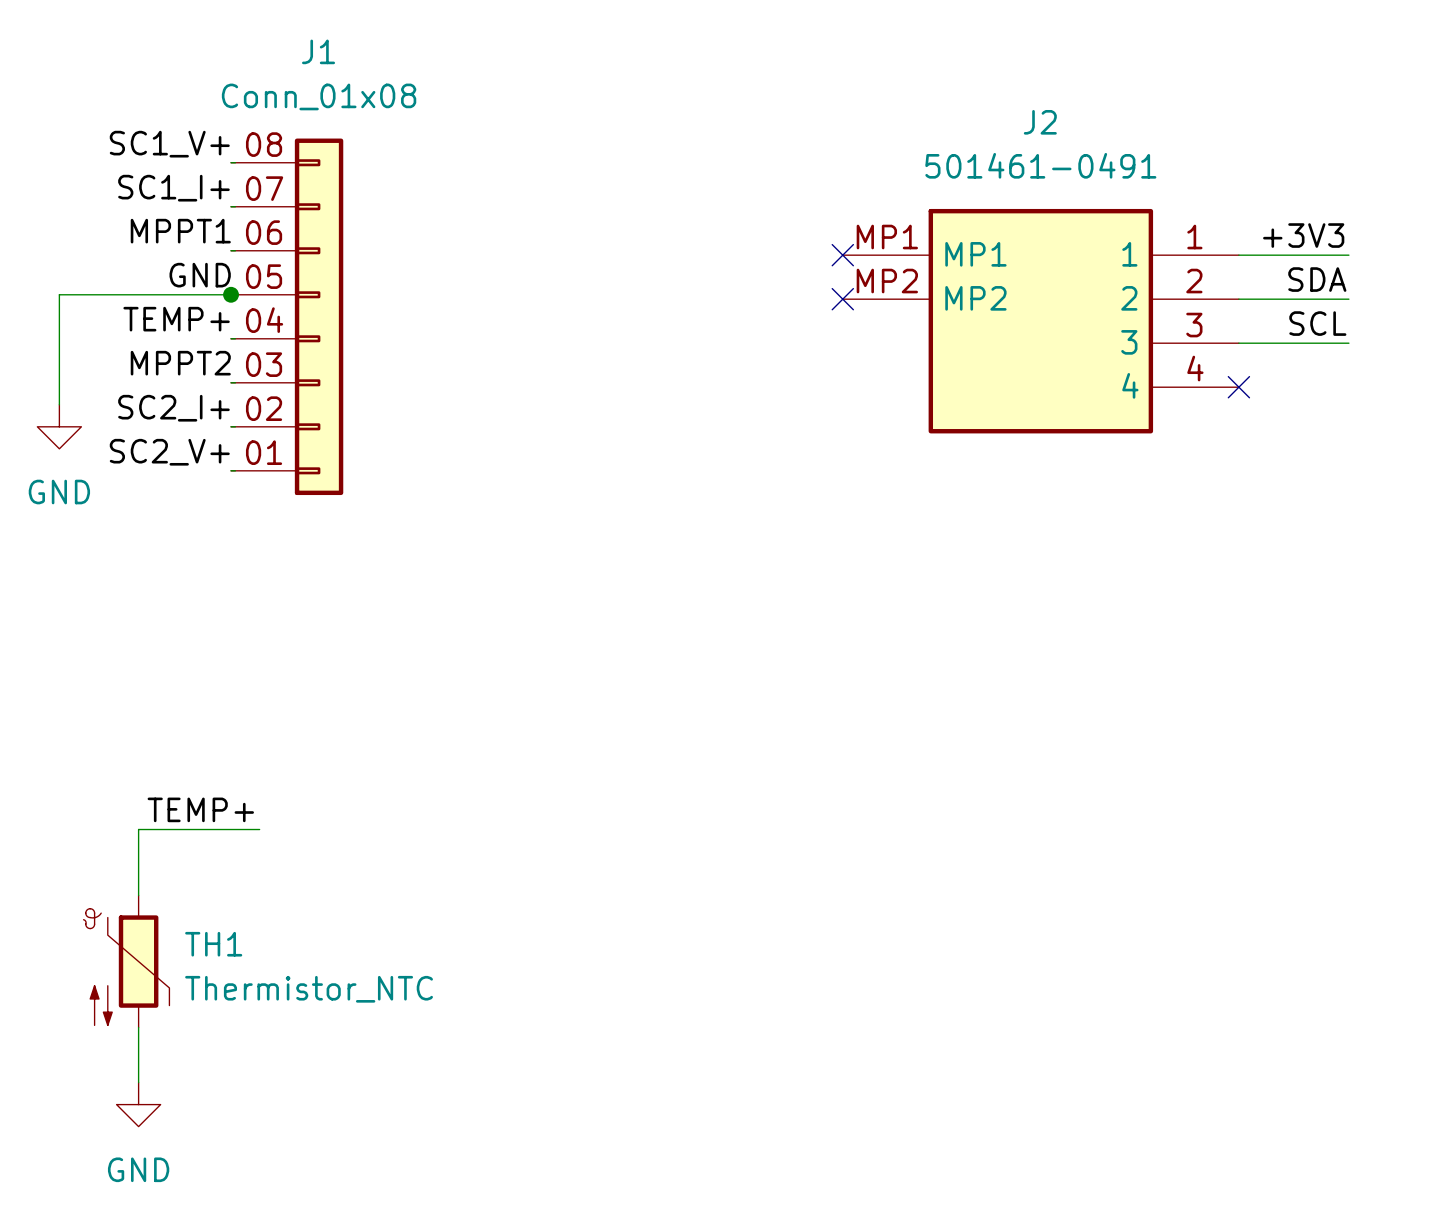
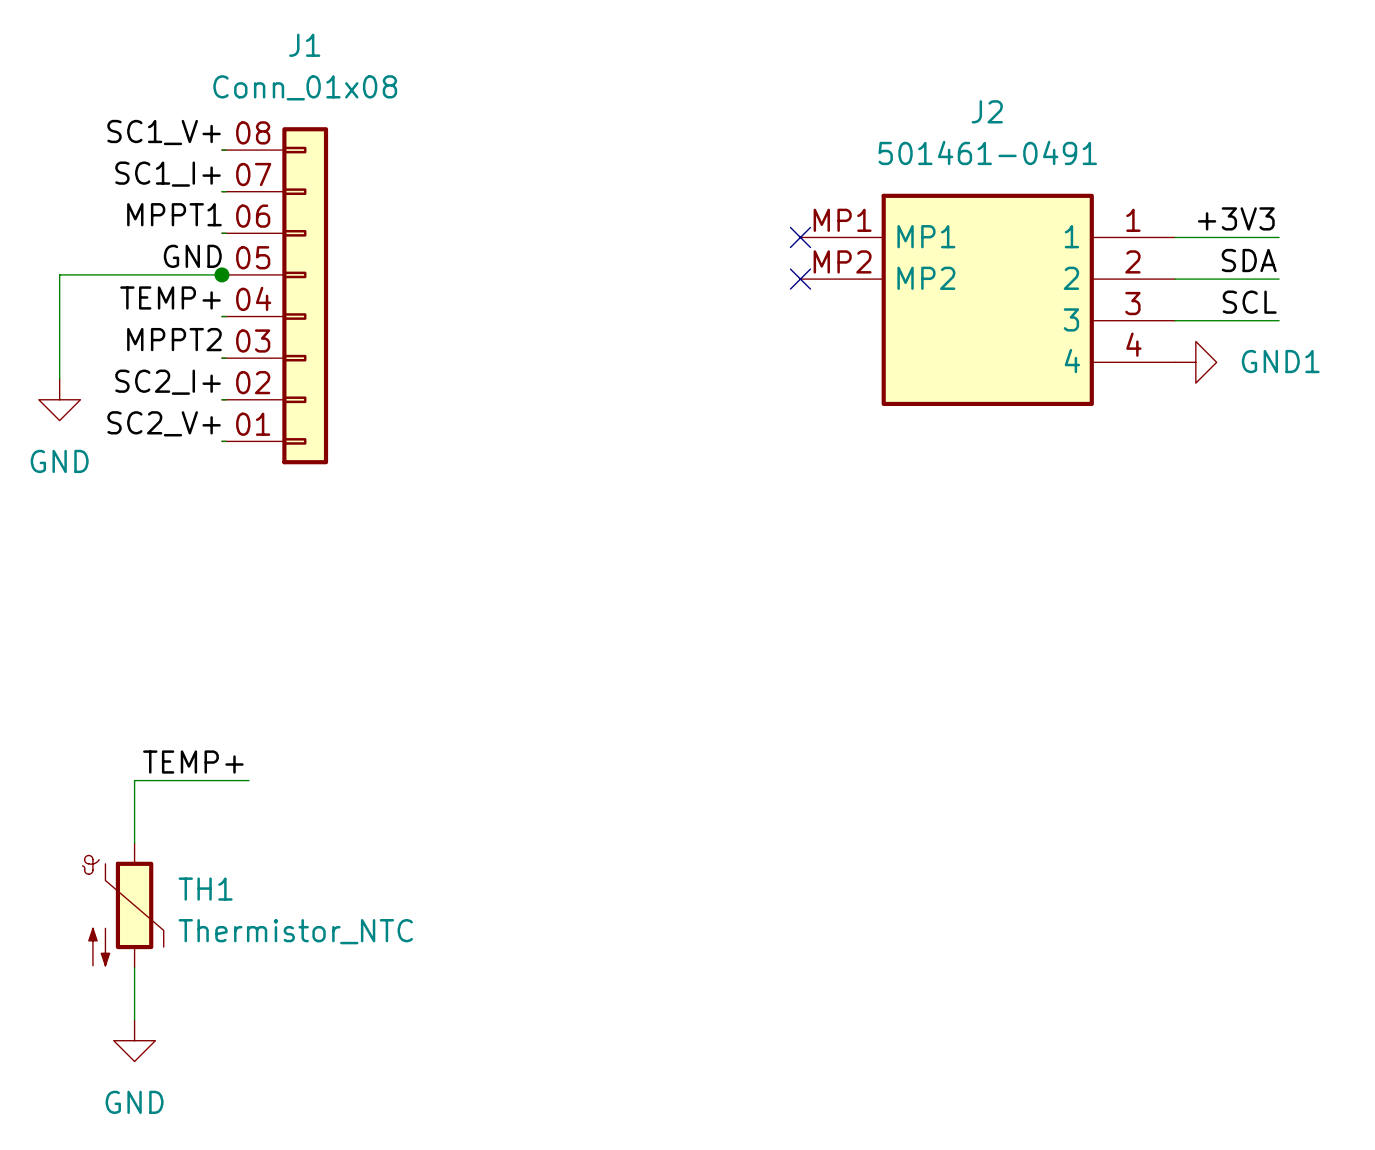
no-connect mark: (1238, 387) -> none
power symbol: none -> GND1 (1195, 362)

